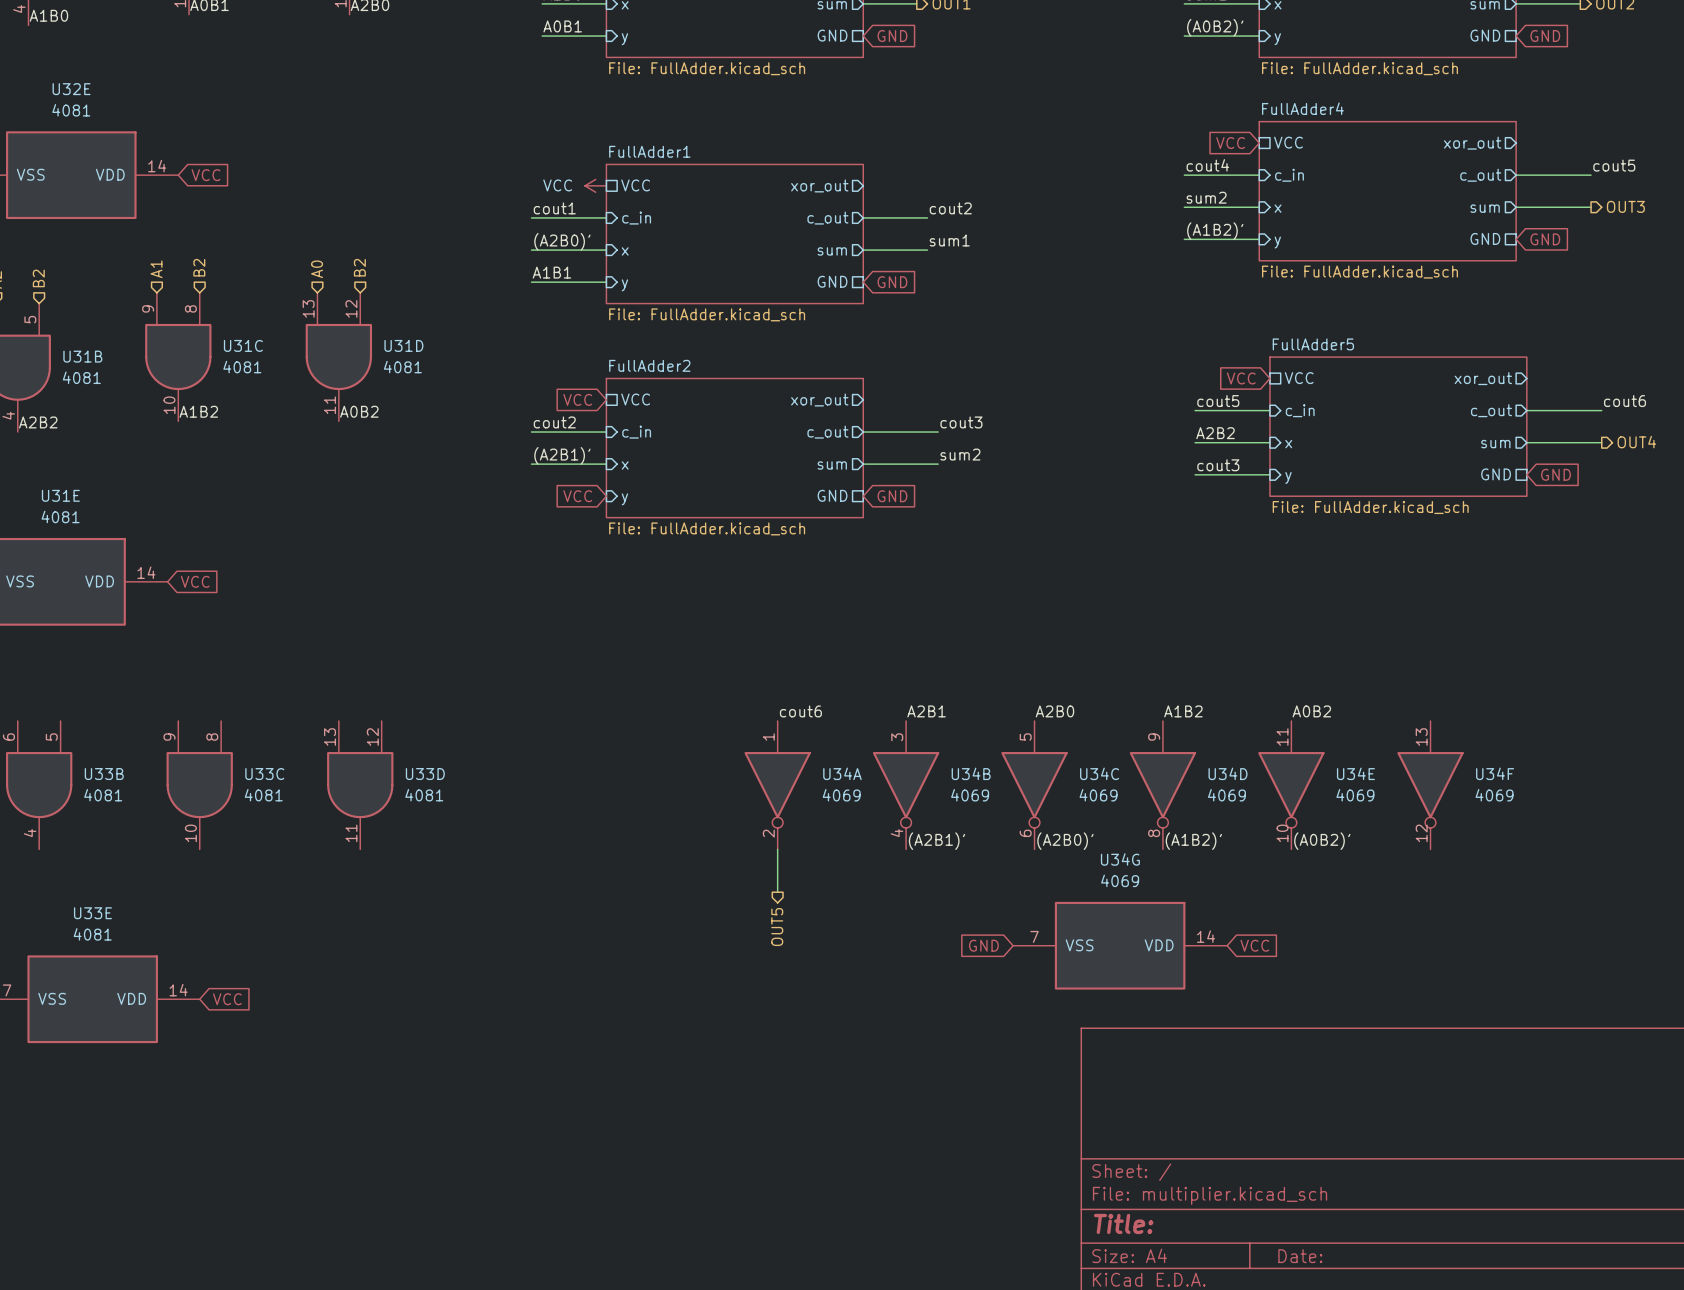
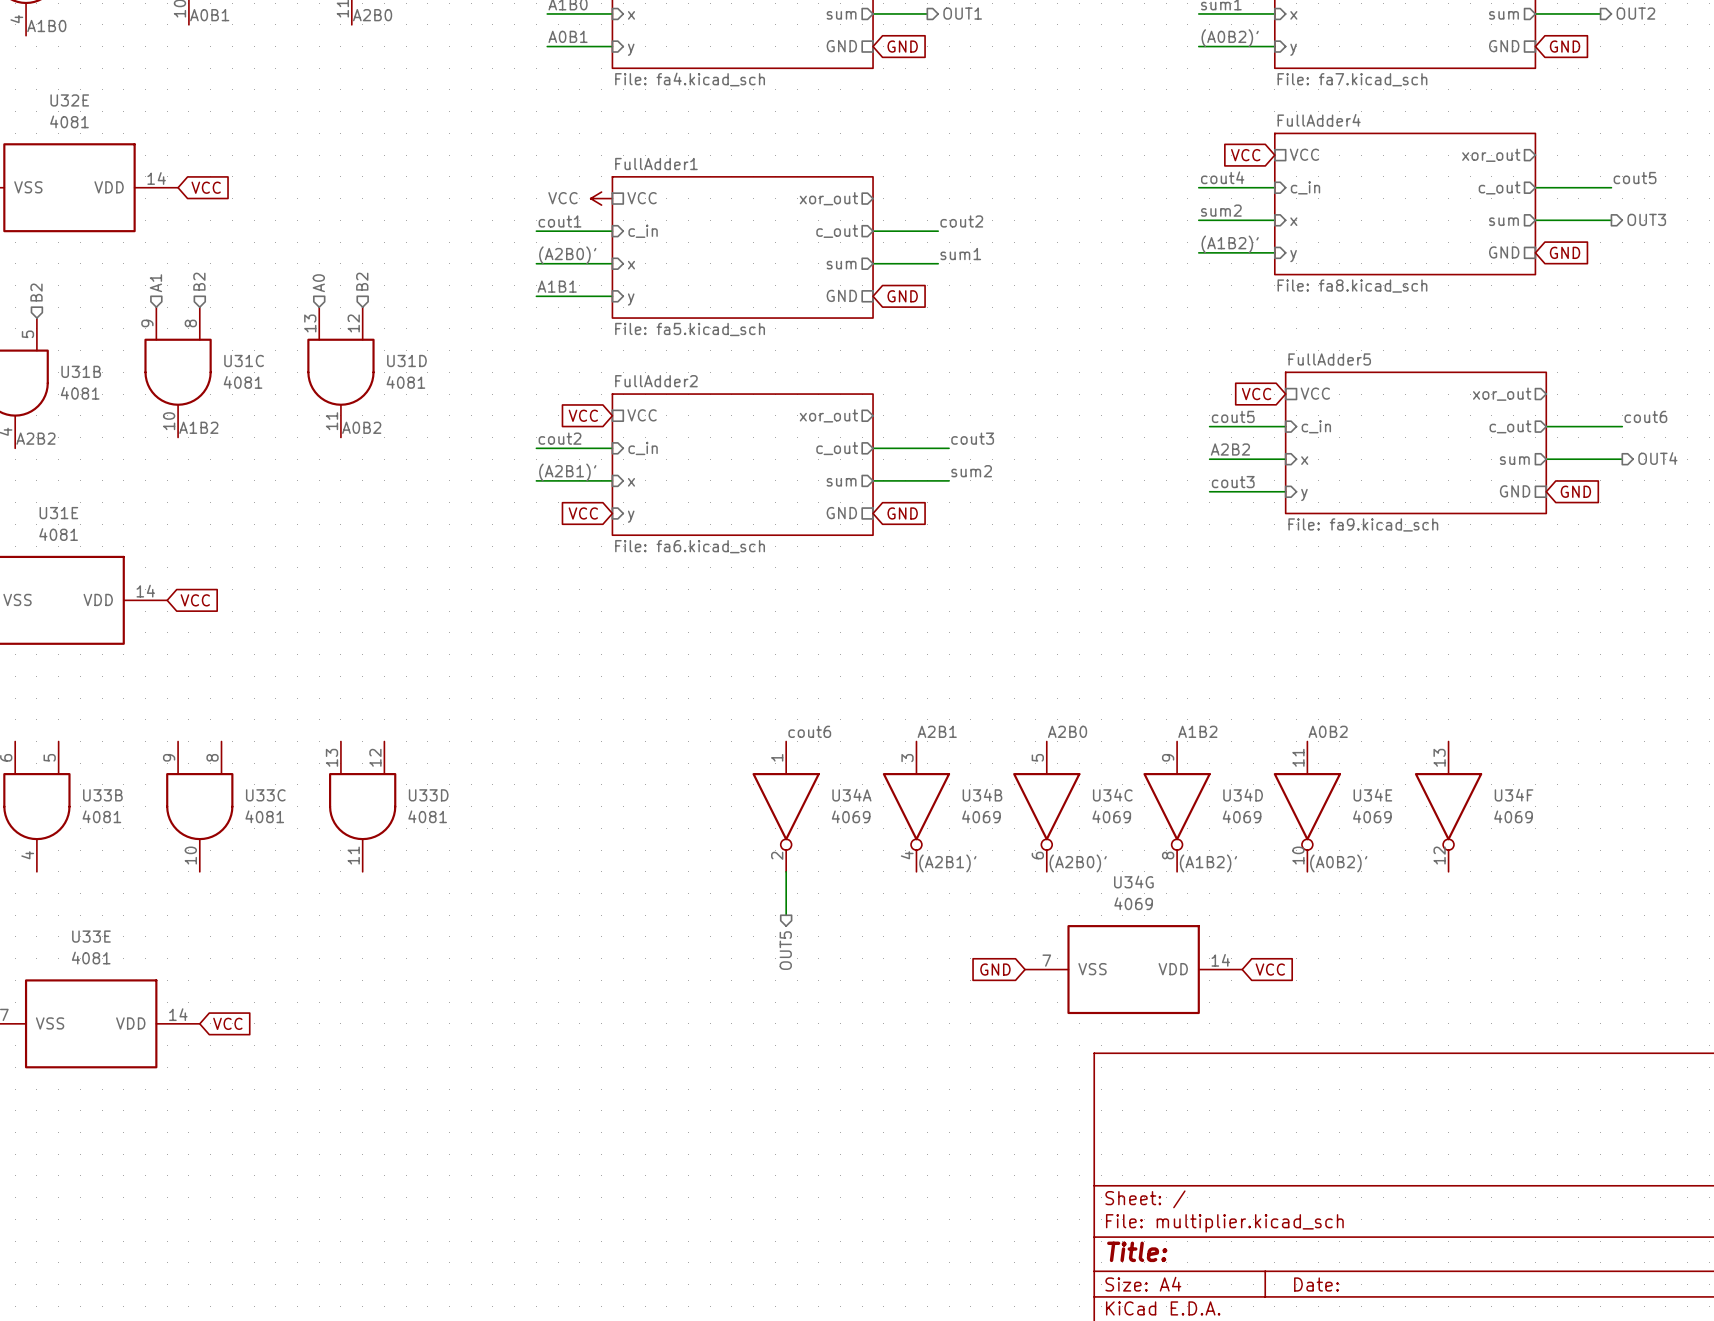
sheet value: File: FullAdder.kicad_sch (707, 68) -> File: fa4.kicad_sch (690, 79)
sheet value: File: FullAdder.kicad_sch (1360, 68) -> File: fa7.kicad_sch (1352, 79)
sheet FullAdder4 value: File: FullAdder.kicad_sch (1360, 272) -> File: fa8.kicad_sch (1352, 286)
sheet FullAdder1 value: File: FullAdder.kicad_sch (707, 314) -> File: fa5.kicad_sch (690, 329)
sheet FullAdder5 value: File: FullAdder.kicad_sch (1370, 507) -> File: fa9.kicad_sch (1363, 524)
sheet FullAdder2 value: File: FullAdder.kicad_sch (707, 528) -> File: fa6.kicad_sch (690, 546)

